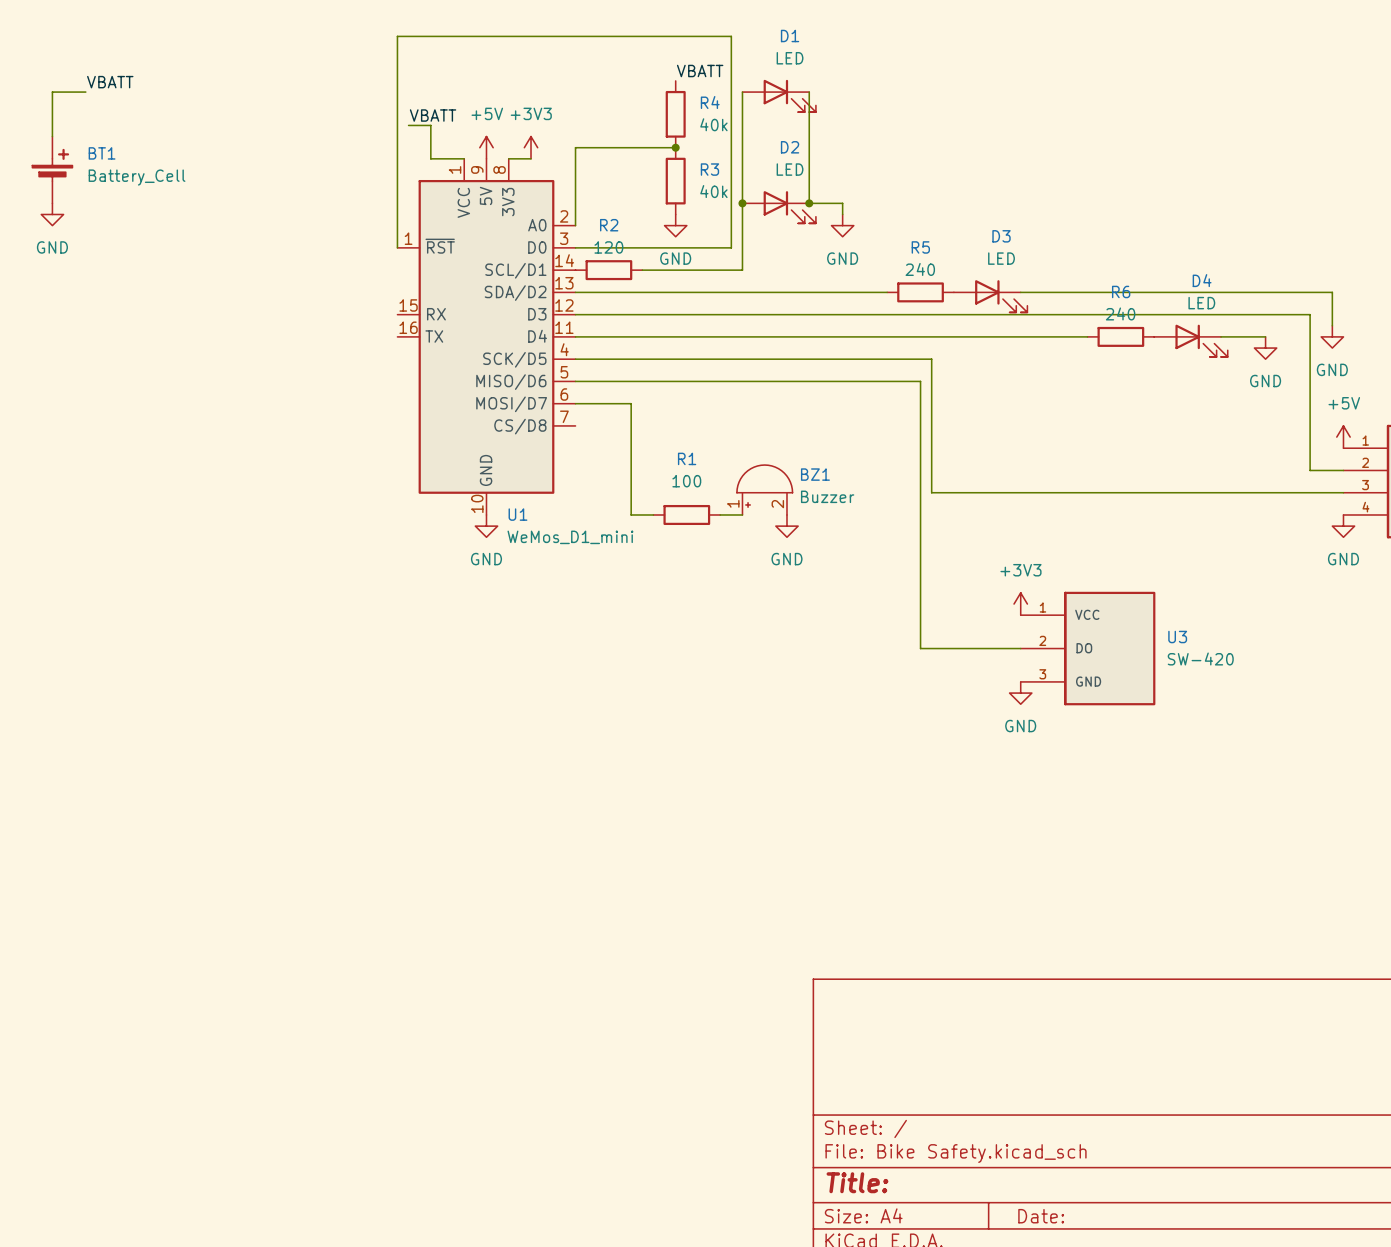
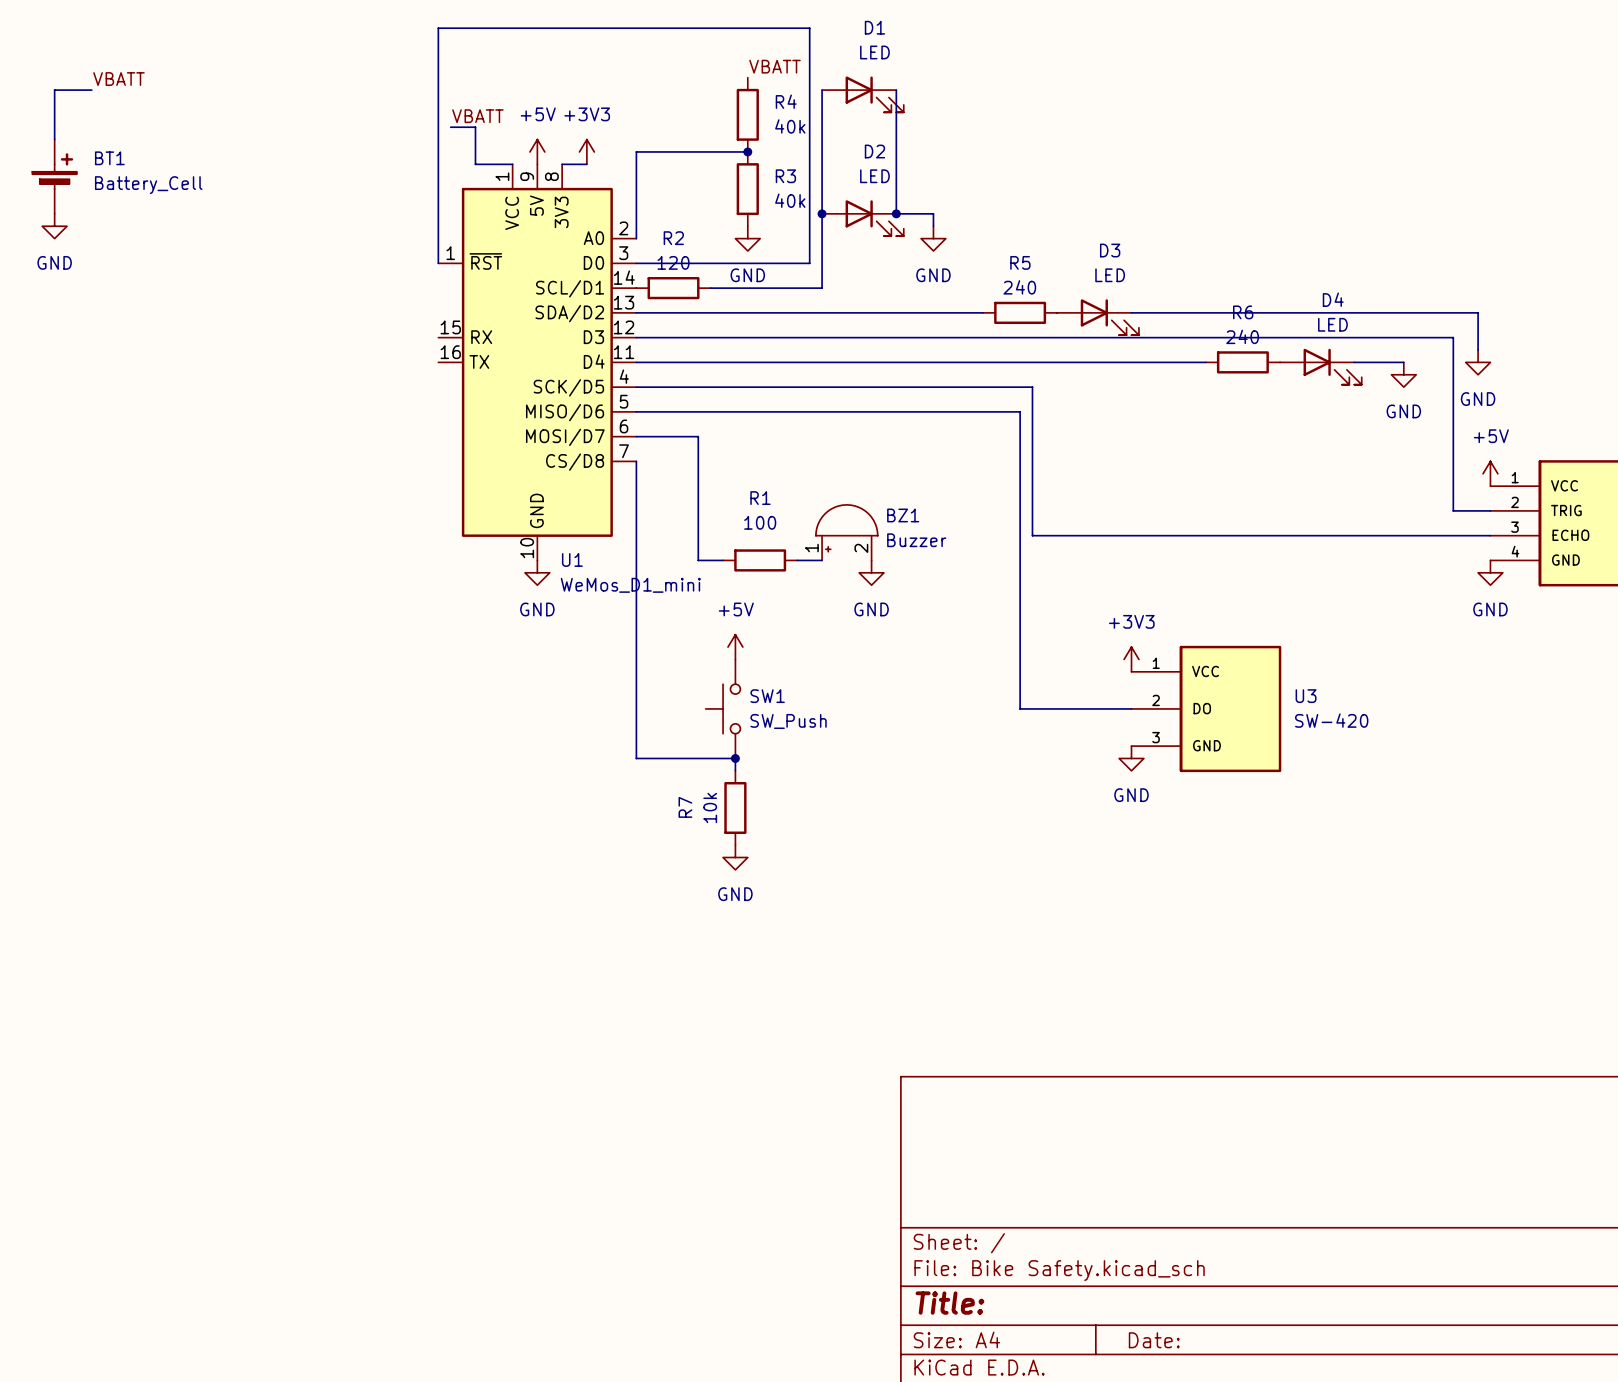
wire: none -> (636, 461) (636, 758) (735, 758) (735, 770)
power symbol: none -> +5V (735, 647)
SW1: none -> SW_Push (723, 708)
junction: none -> (735, 758)
R7: none -> 10k (735, 807)
power symbol: none -> GND (735, 857)

